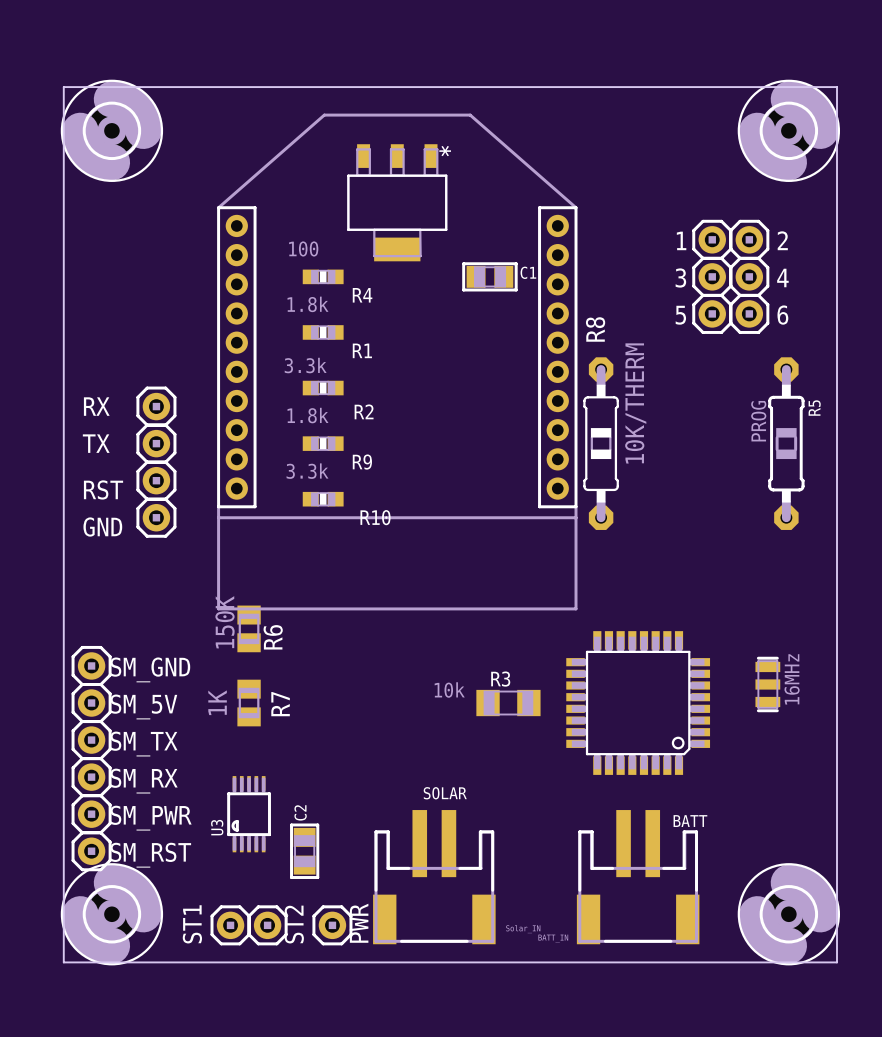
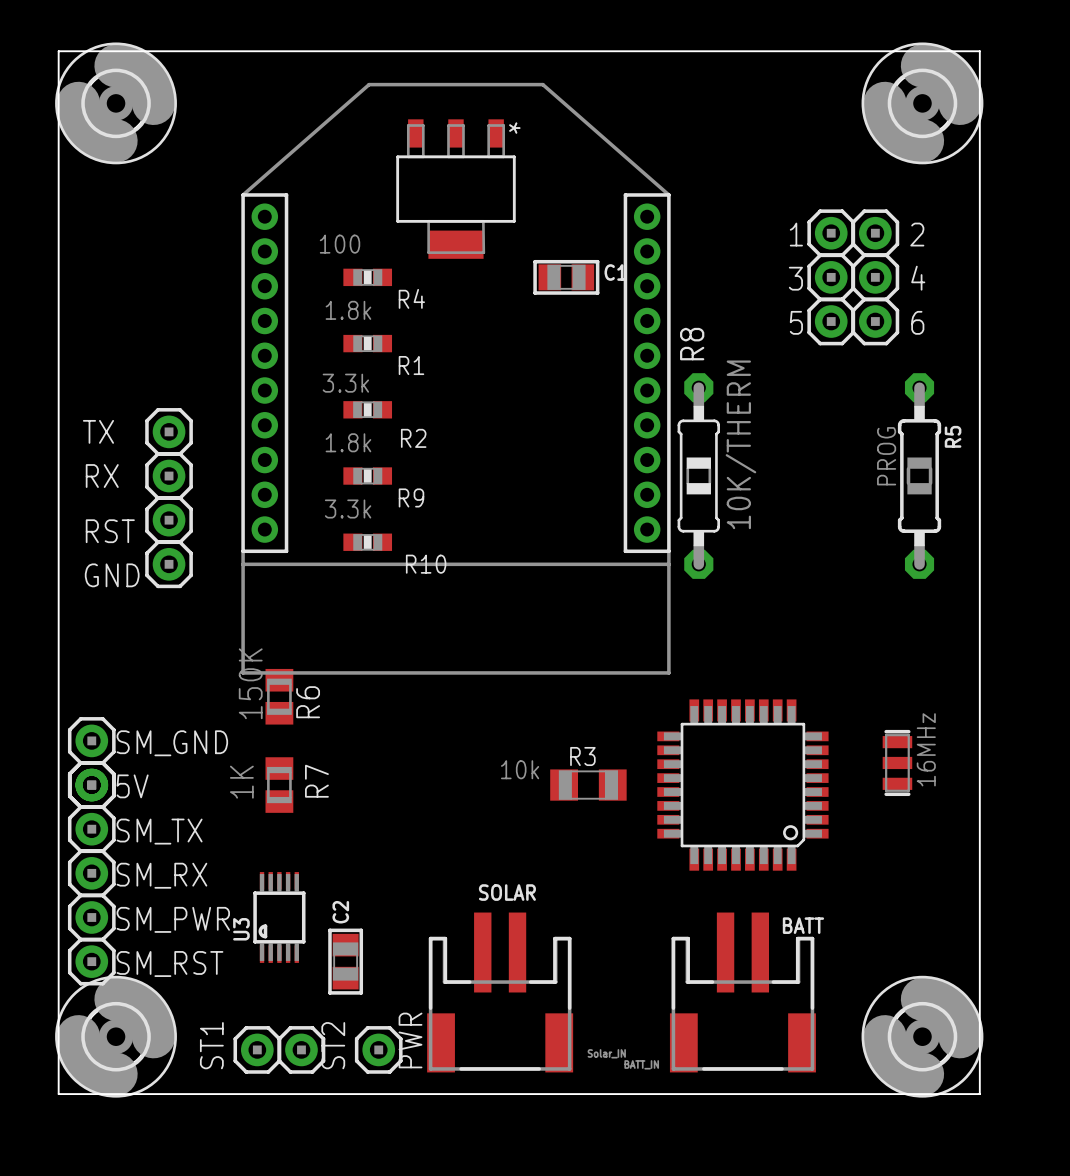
text: RX (96, 406) -> TX (98, 431)
text: TX (96, 443) -> RX (102, 476)
SM_5V: (91, 703) -> none
part: none -> (91, 785)
5V: none -> (91, 785)

